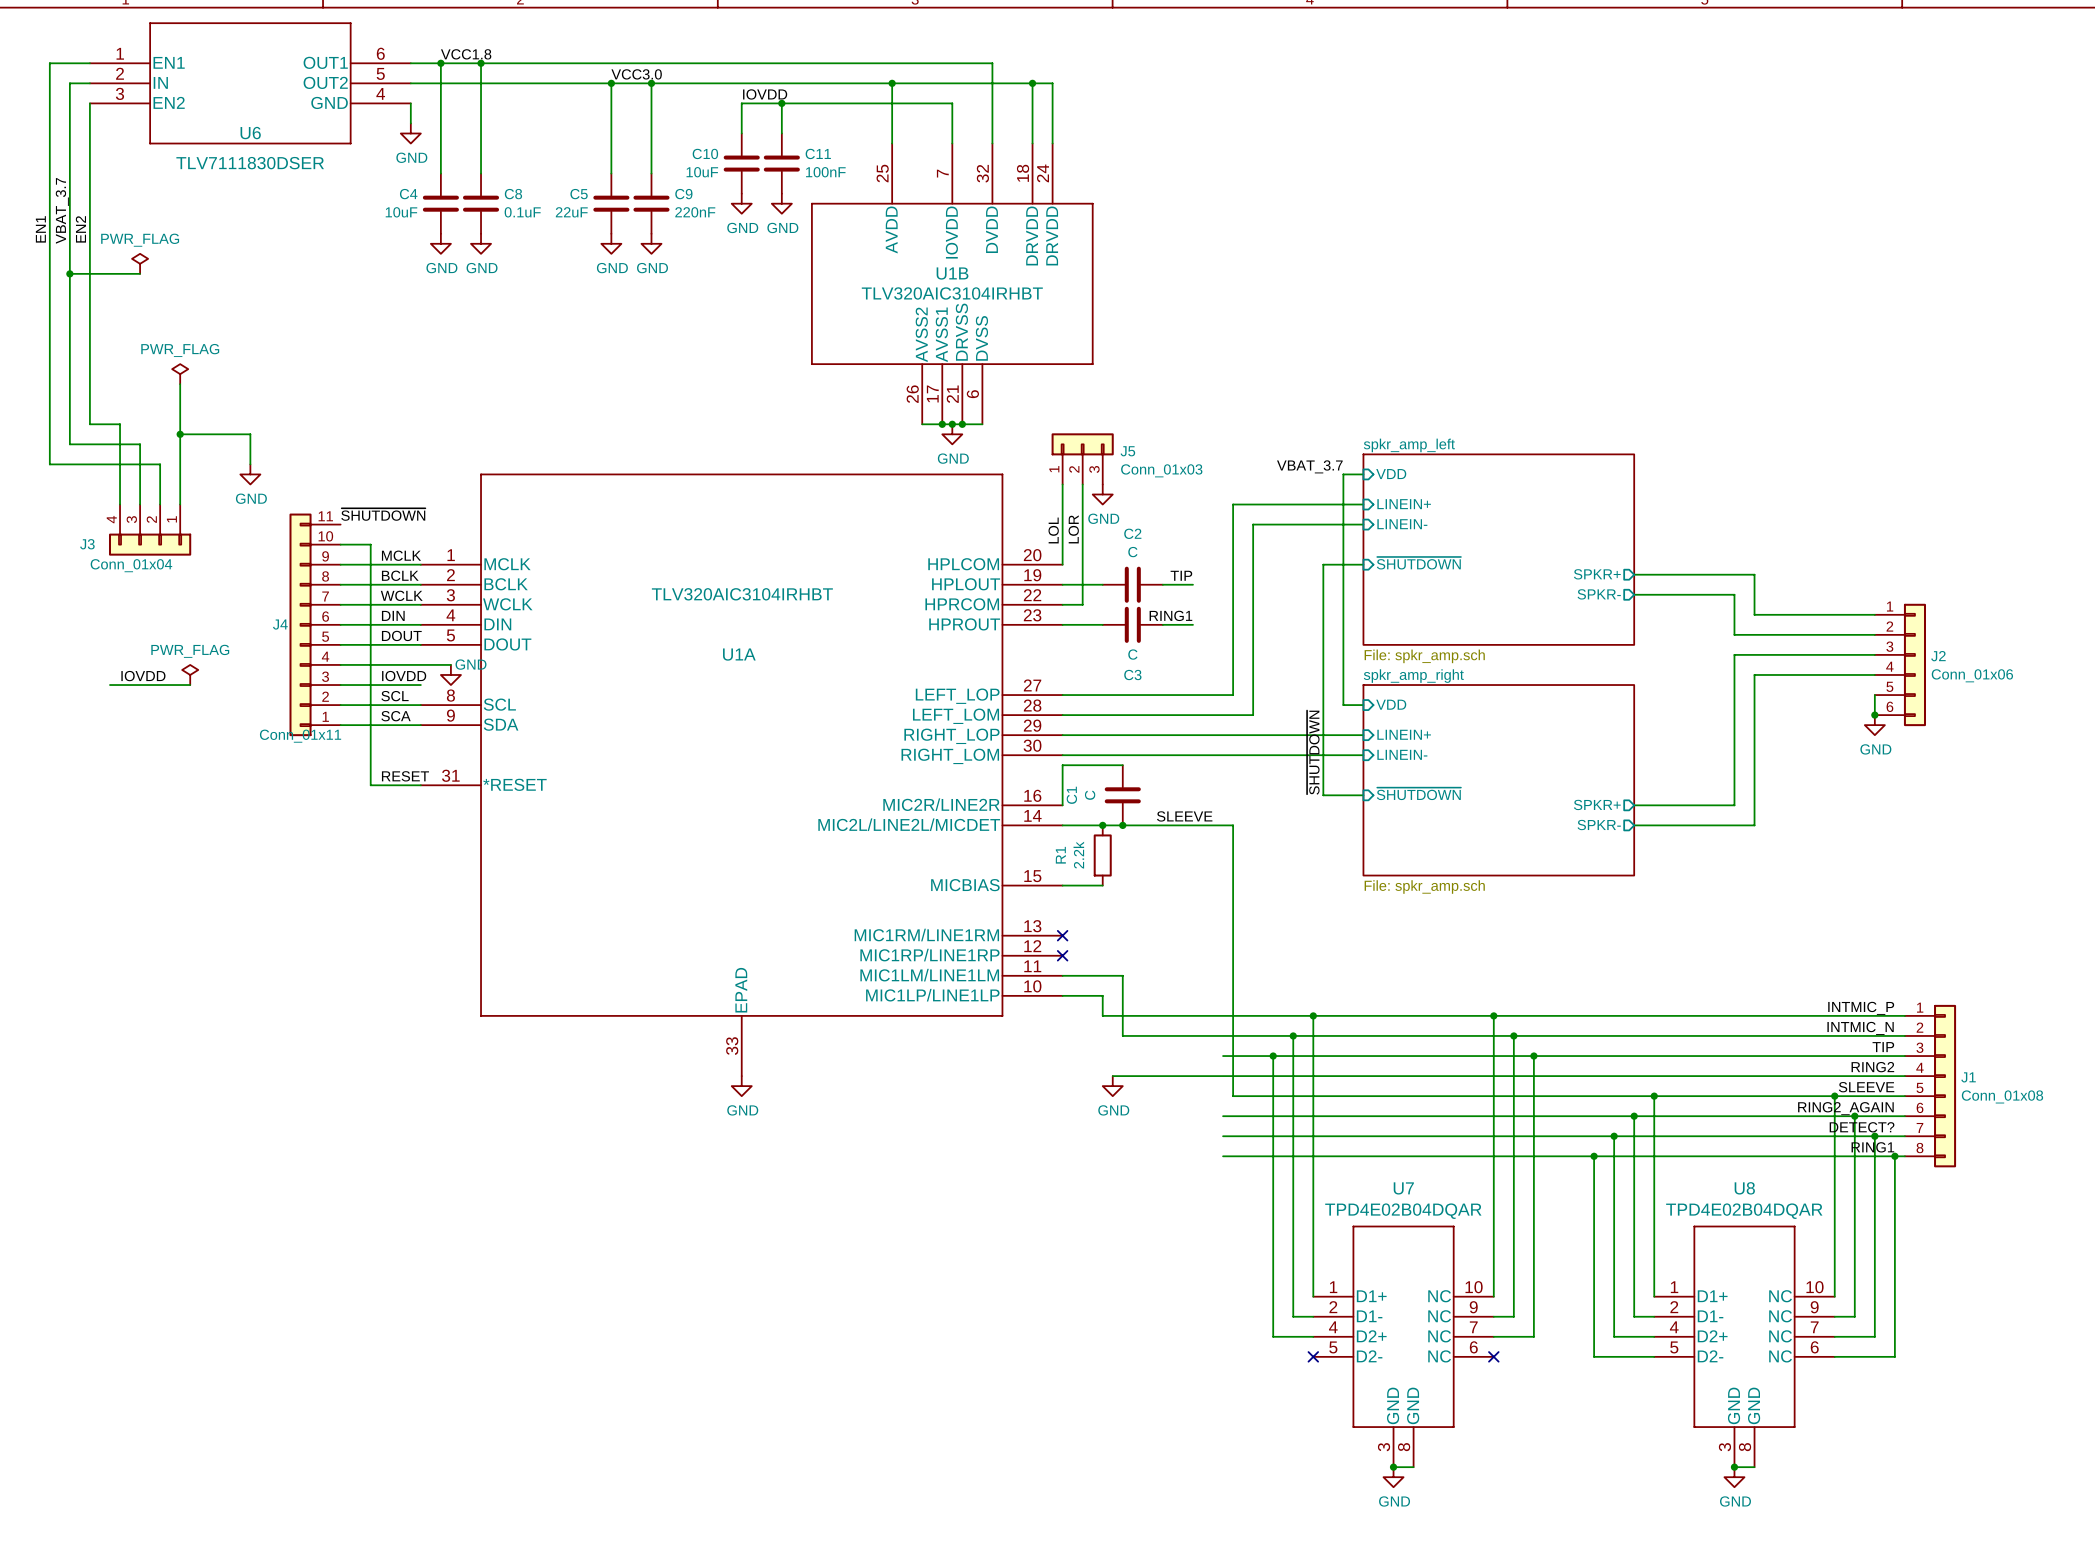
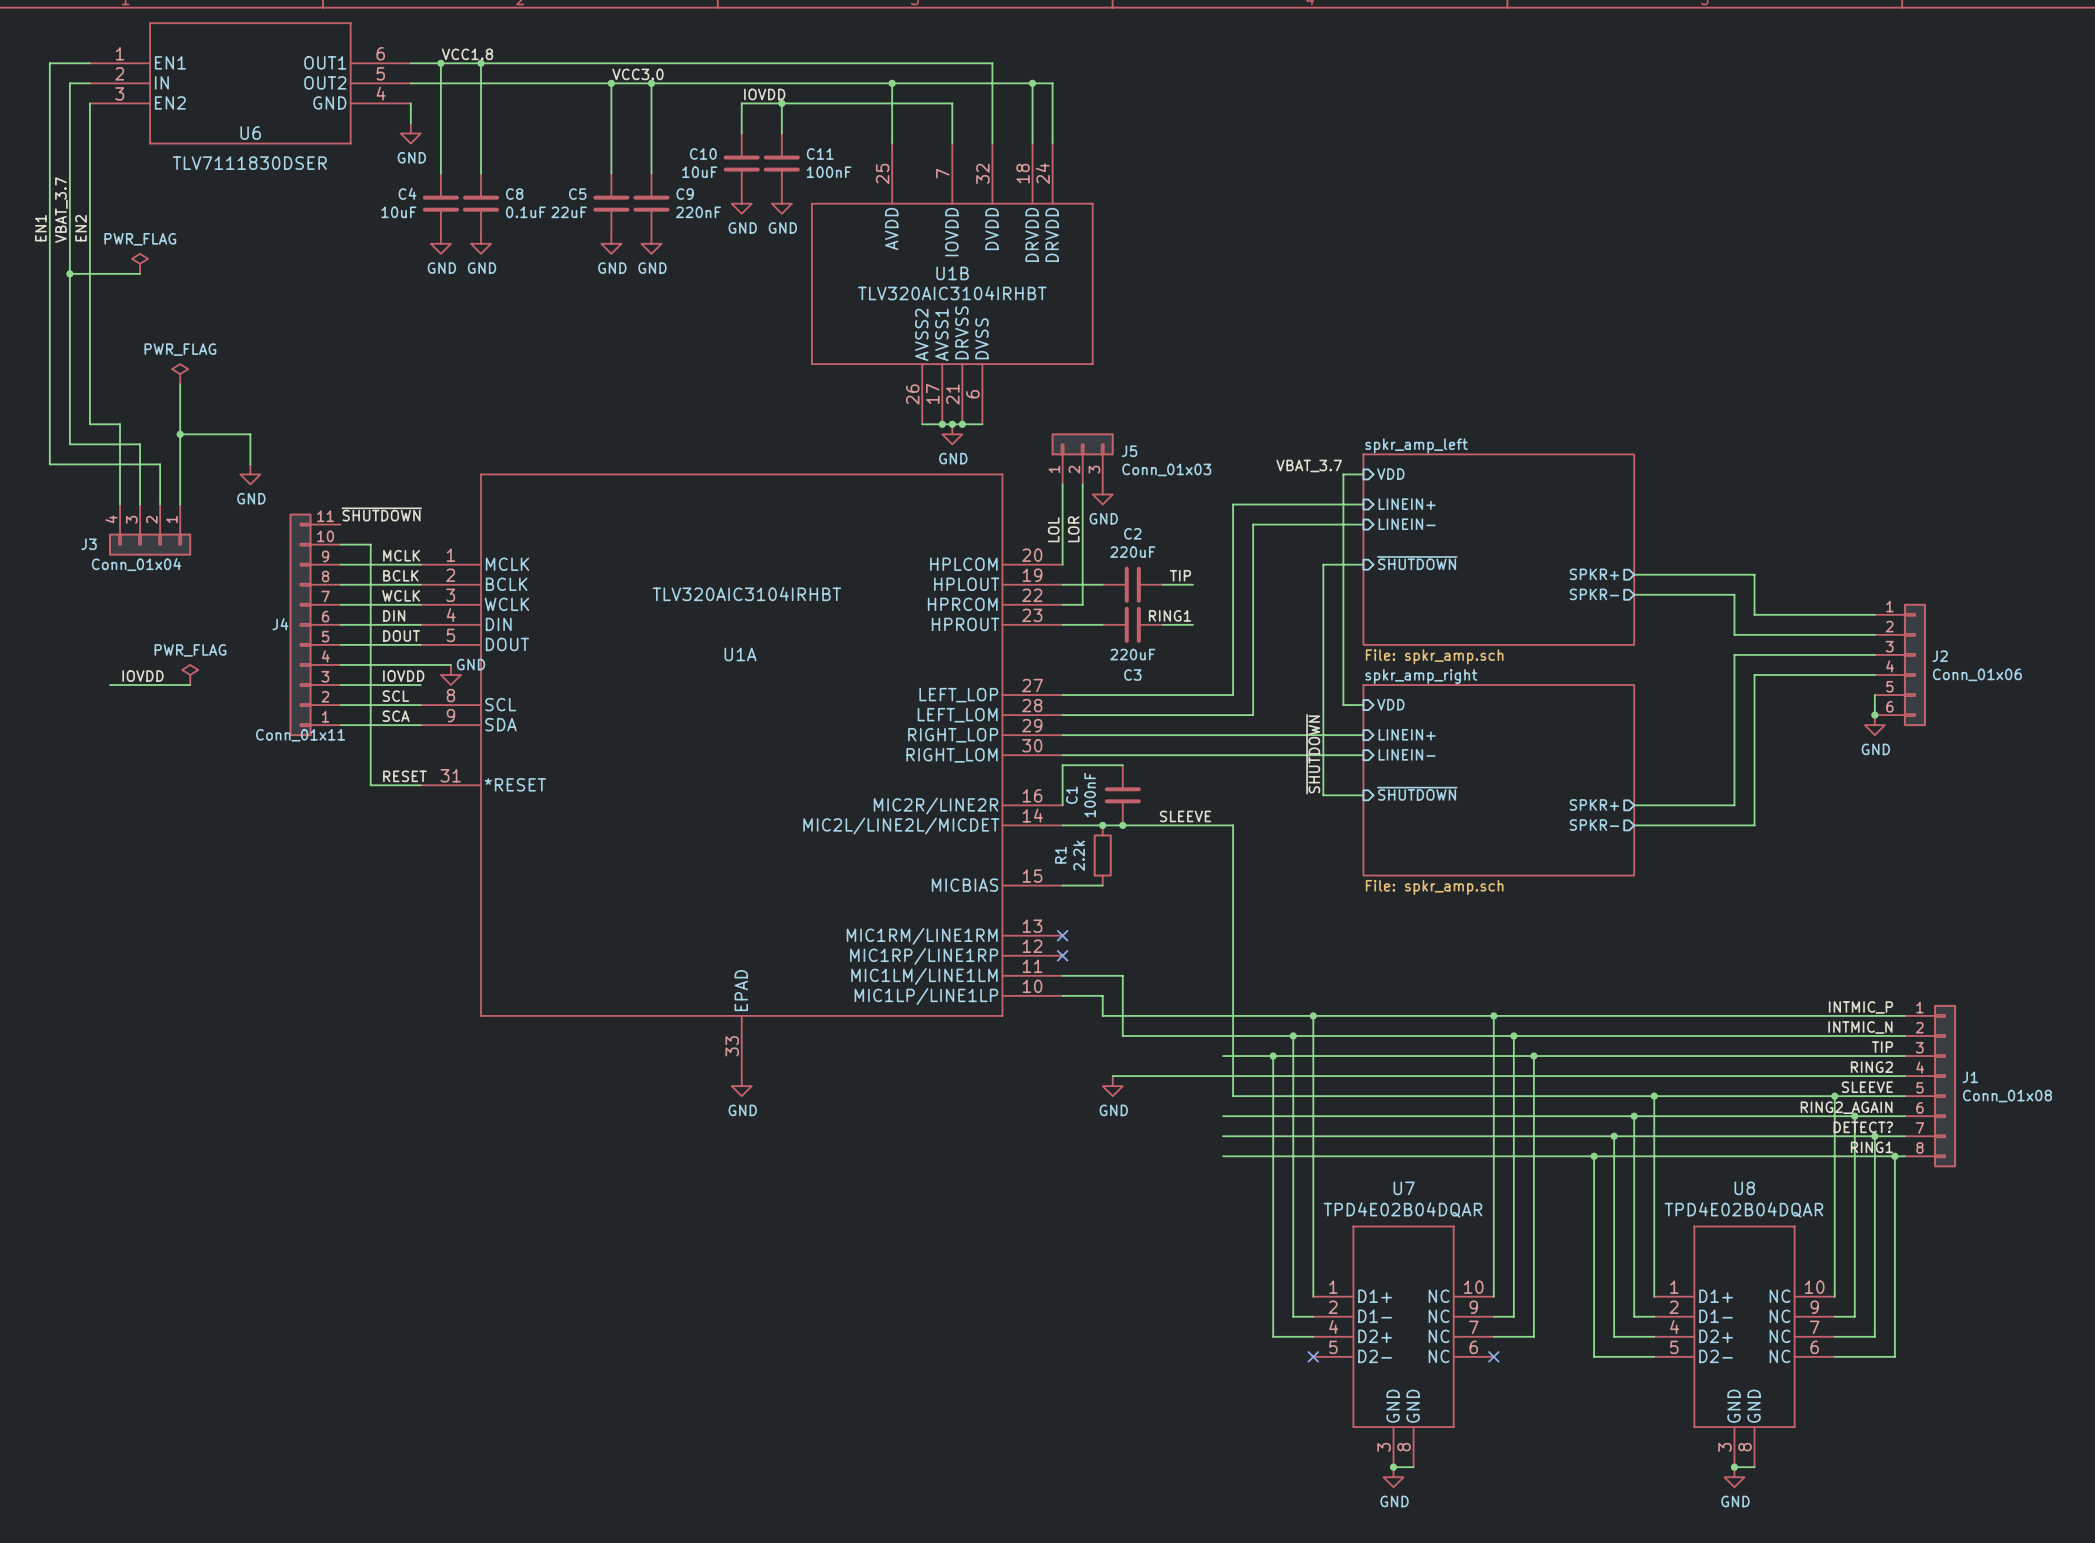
C2 value: C (1132, 552) -> 220uF (1132, 552)
C3 value: C (1132, 654) -> 220uF (1132, 654)
C1 value: C (1090, 795) -> 100nF (1090, 795)

